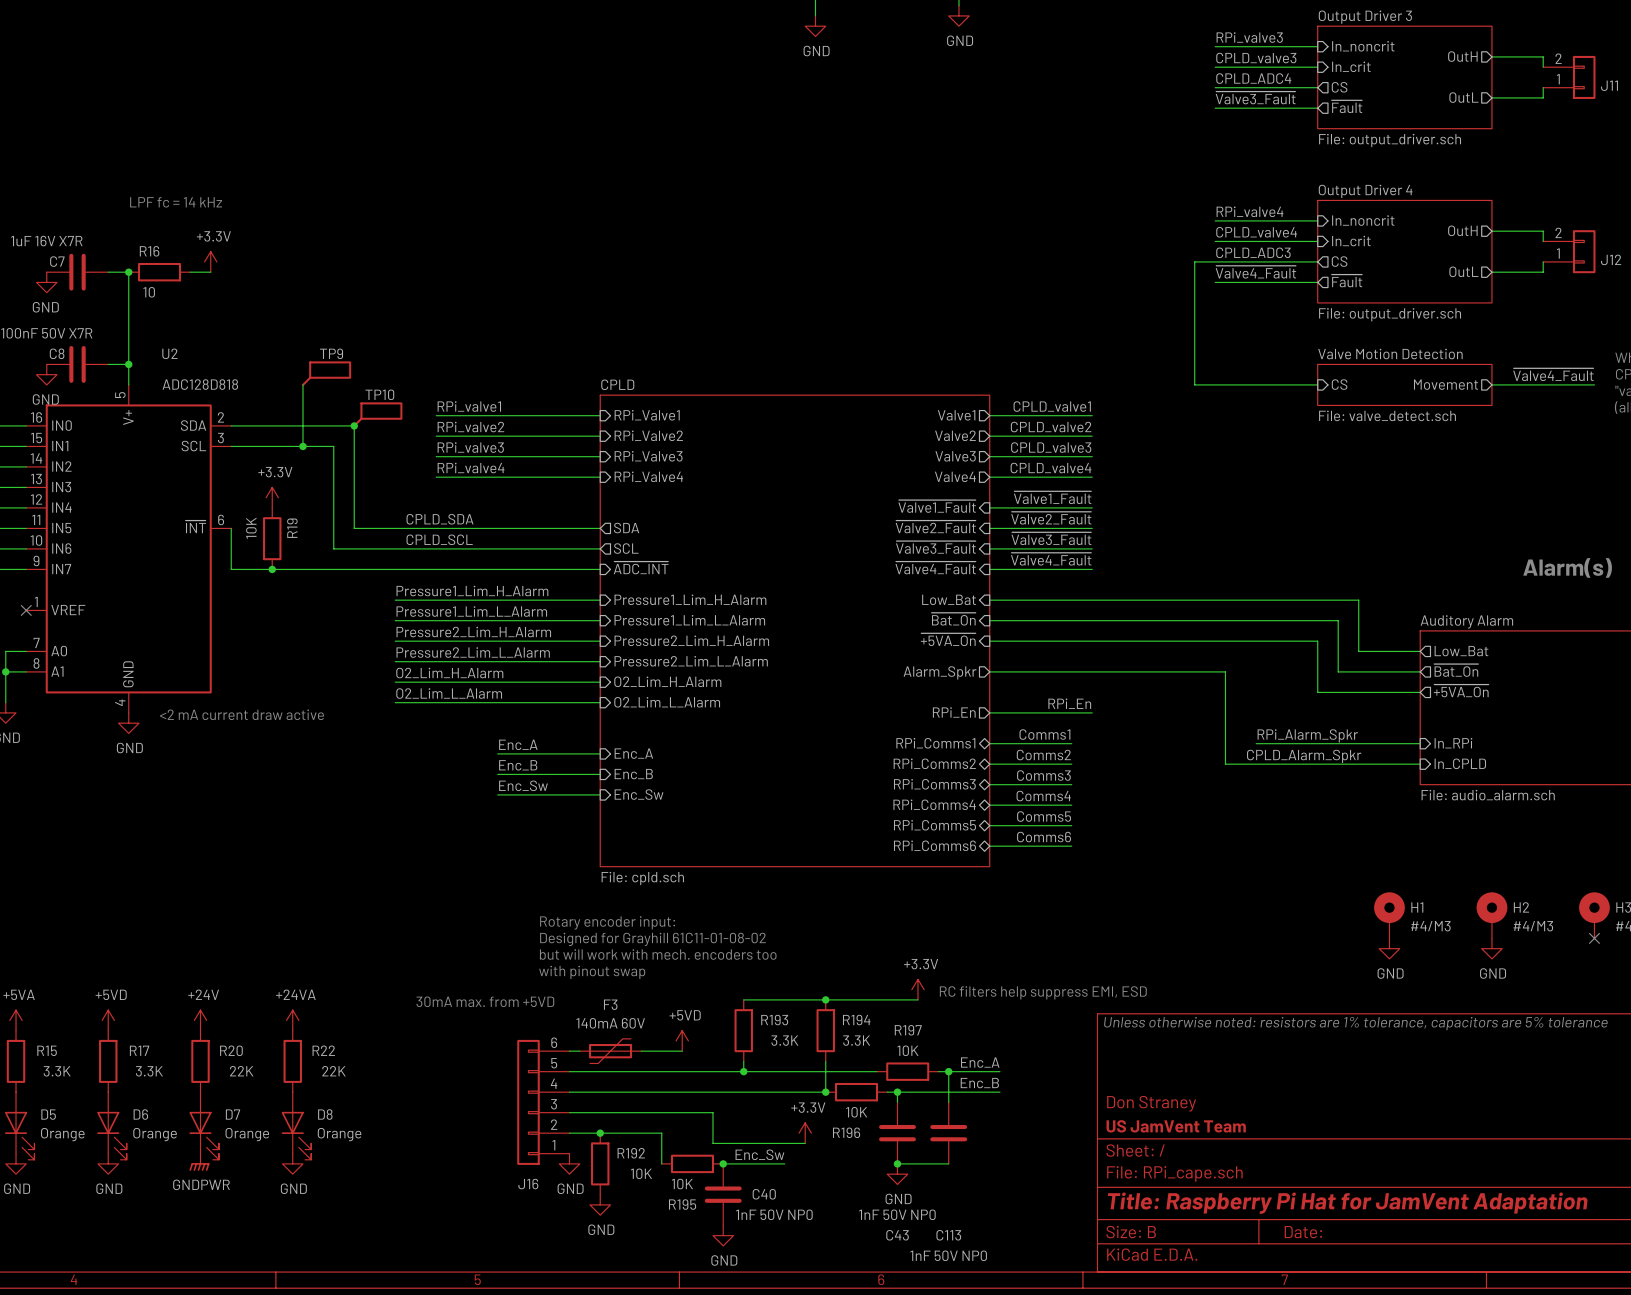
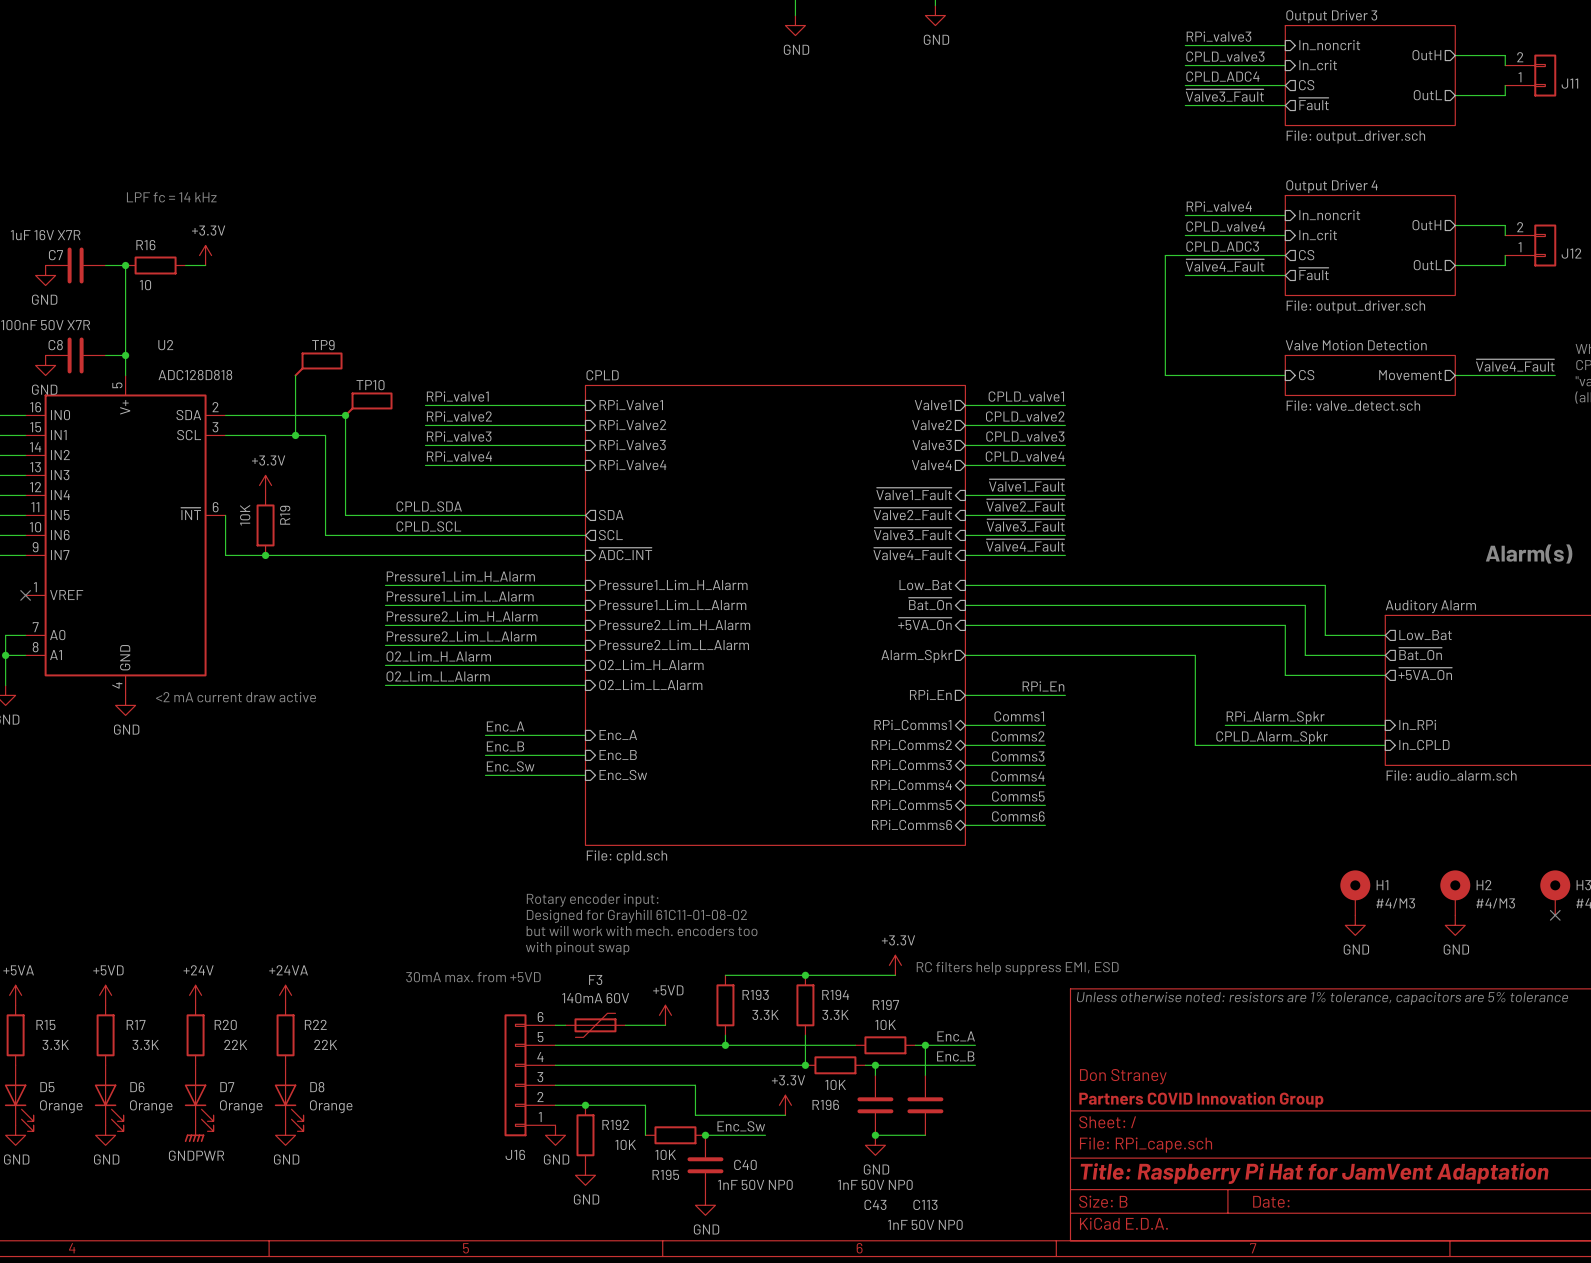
title block: US JamVent Team (1176, 1126) -> Partners COVID Innovation Group (1201, 1099)

